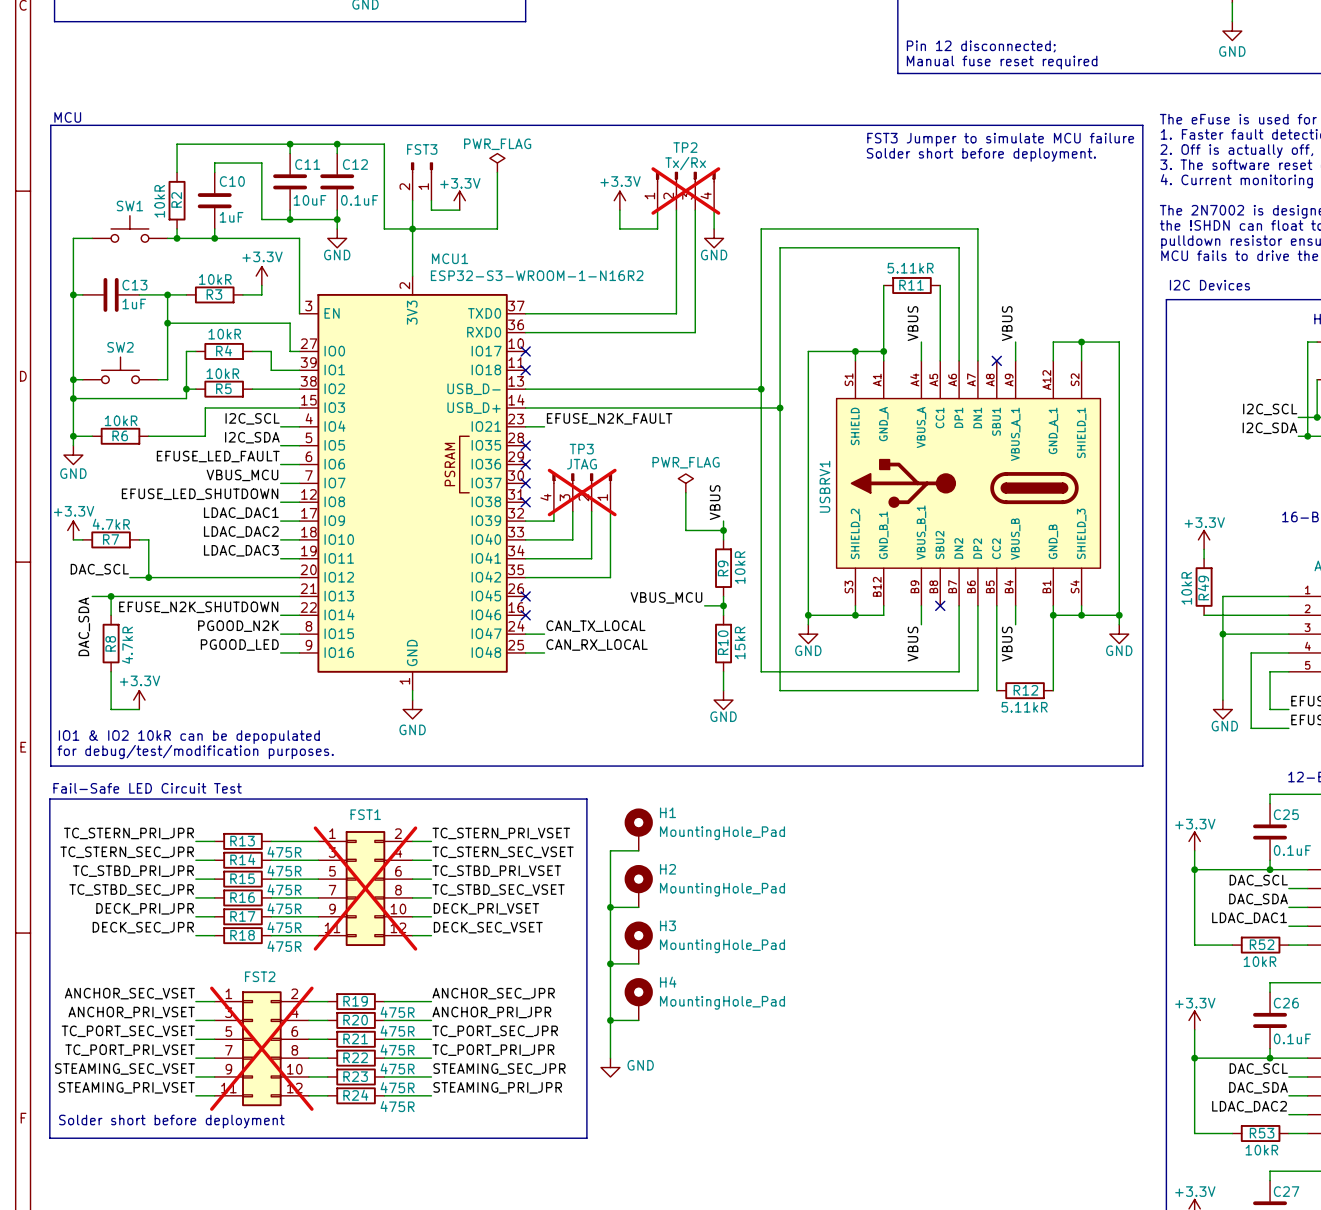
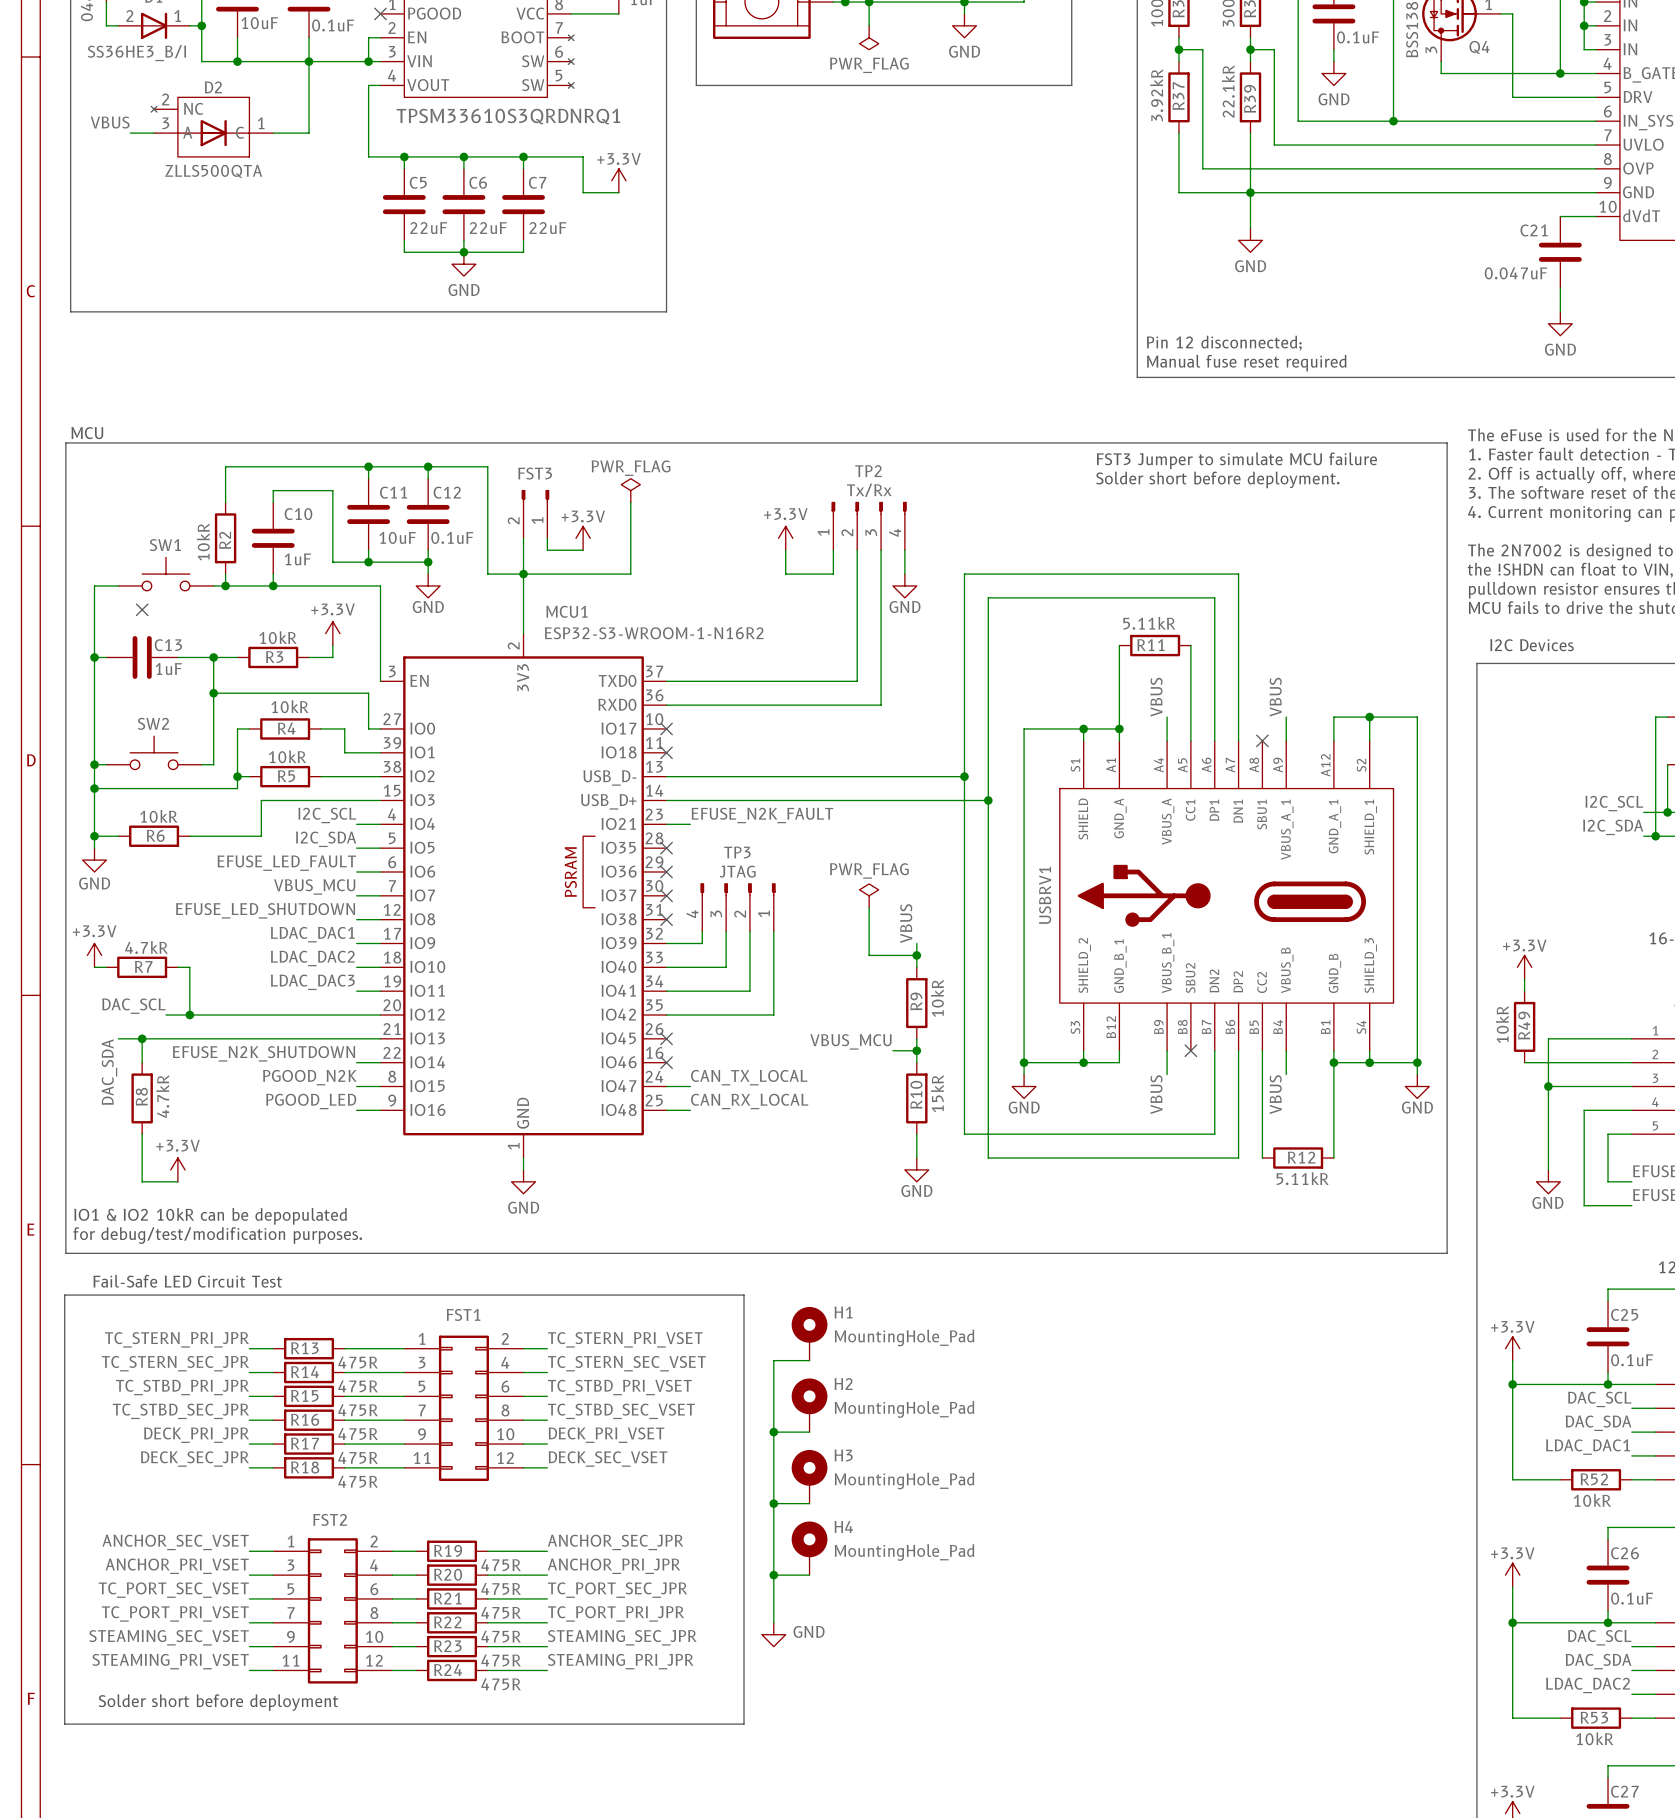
TP2 do-not-place cross: (685, 191) -> none
no-connect mark: none -> (142, 609)
TP3 do-not-place cross: (582, 492) -> none
FST1 do-not-place cross: (365, 888) -> none
FST2 do-not-place cross: (261, 1048) -> none

